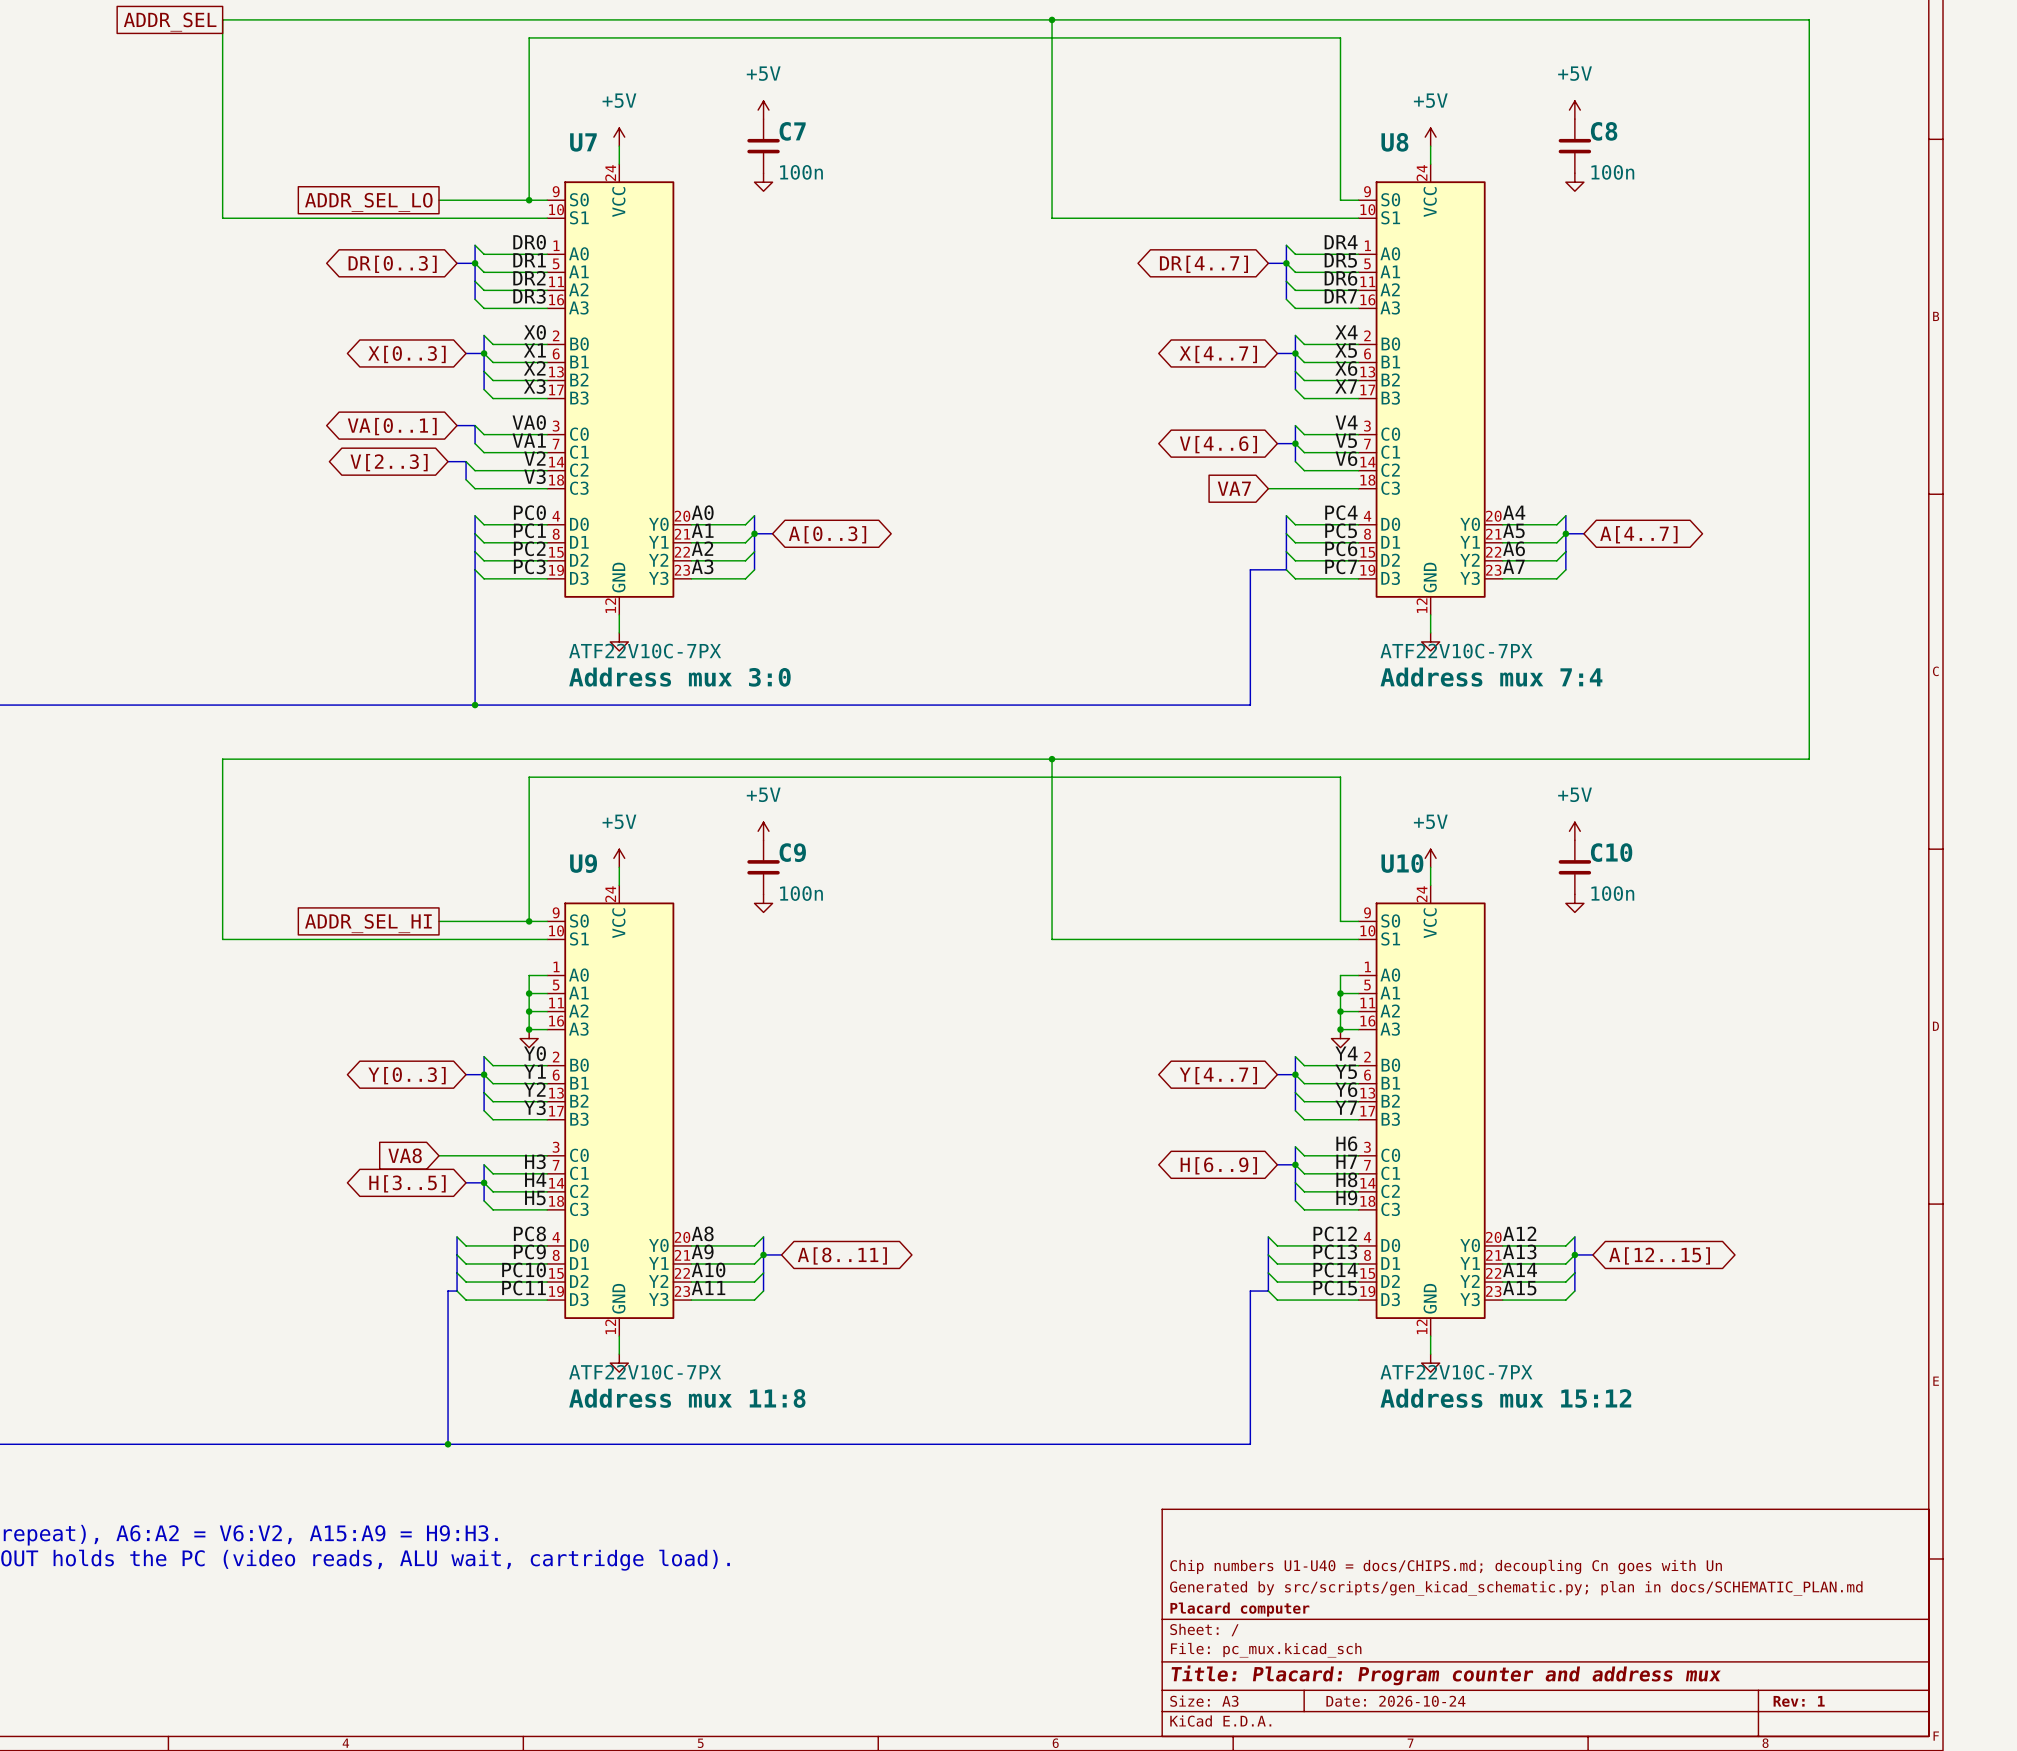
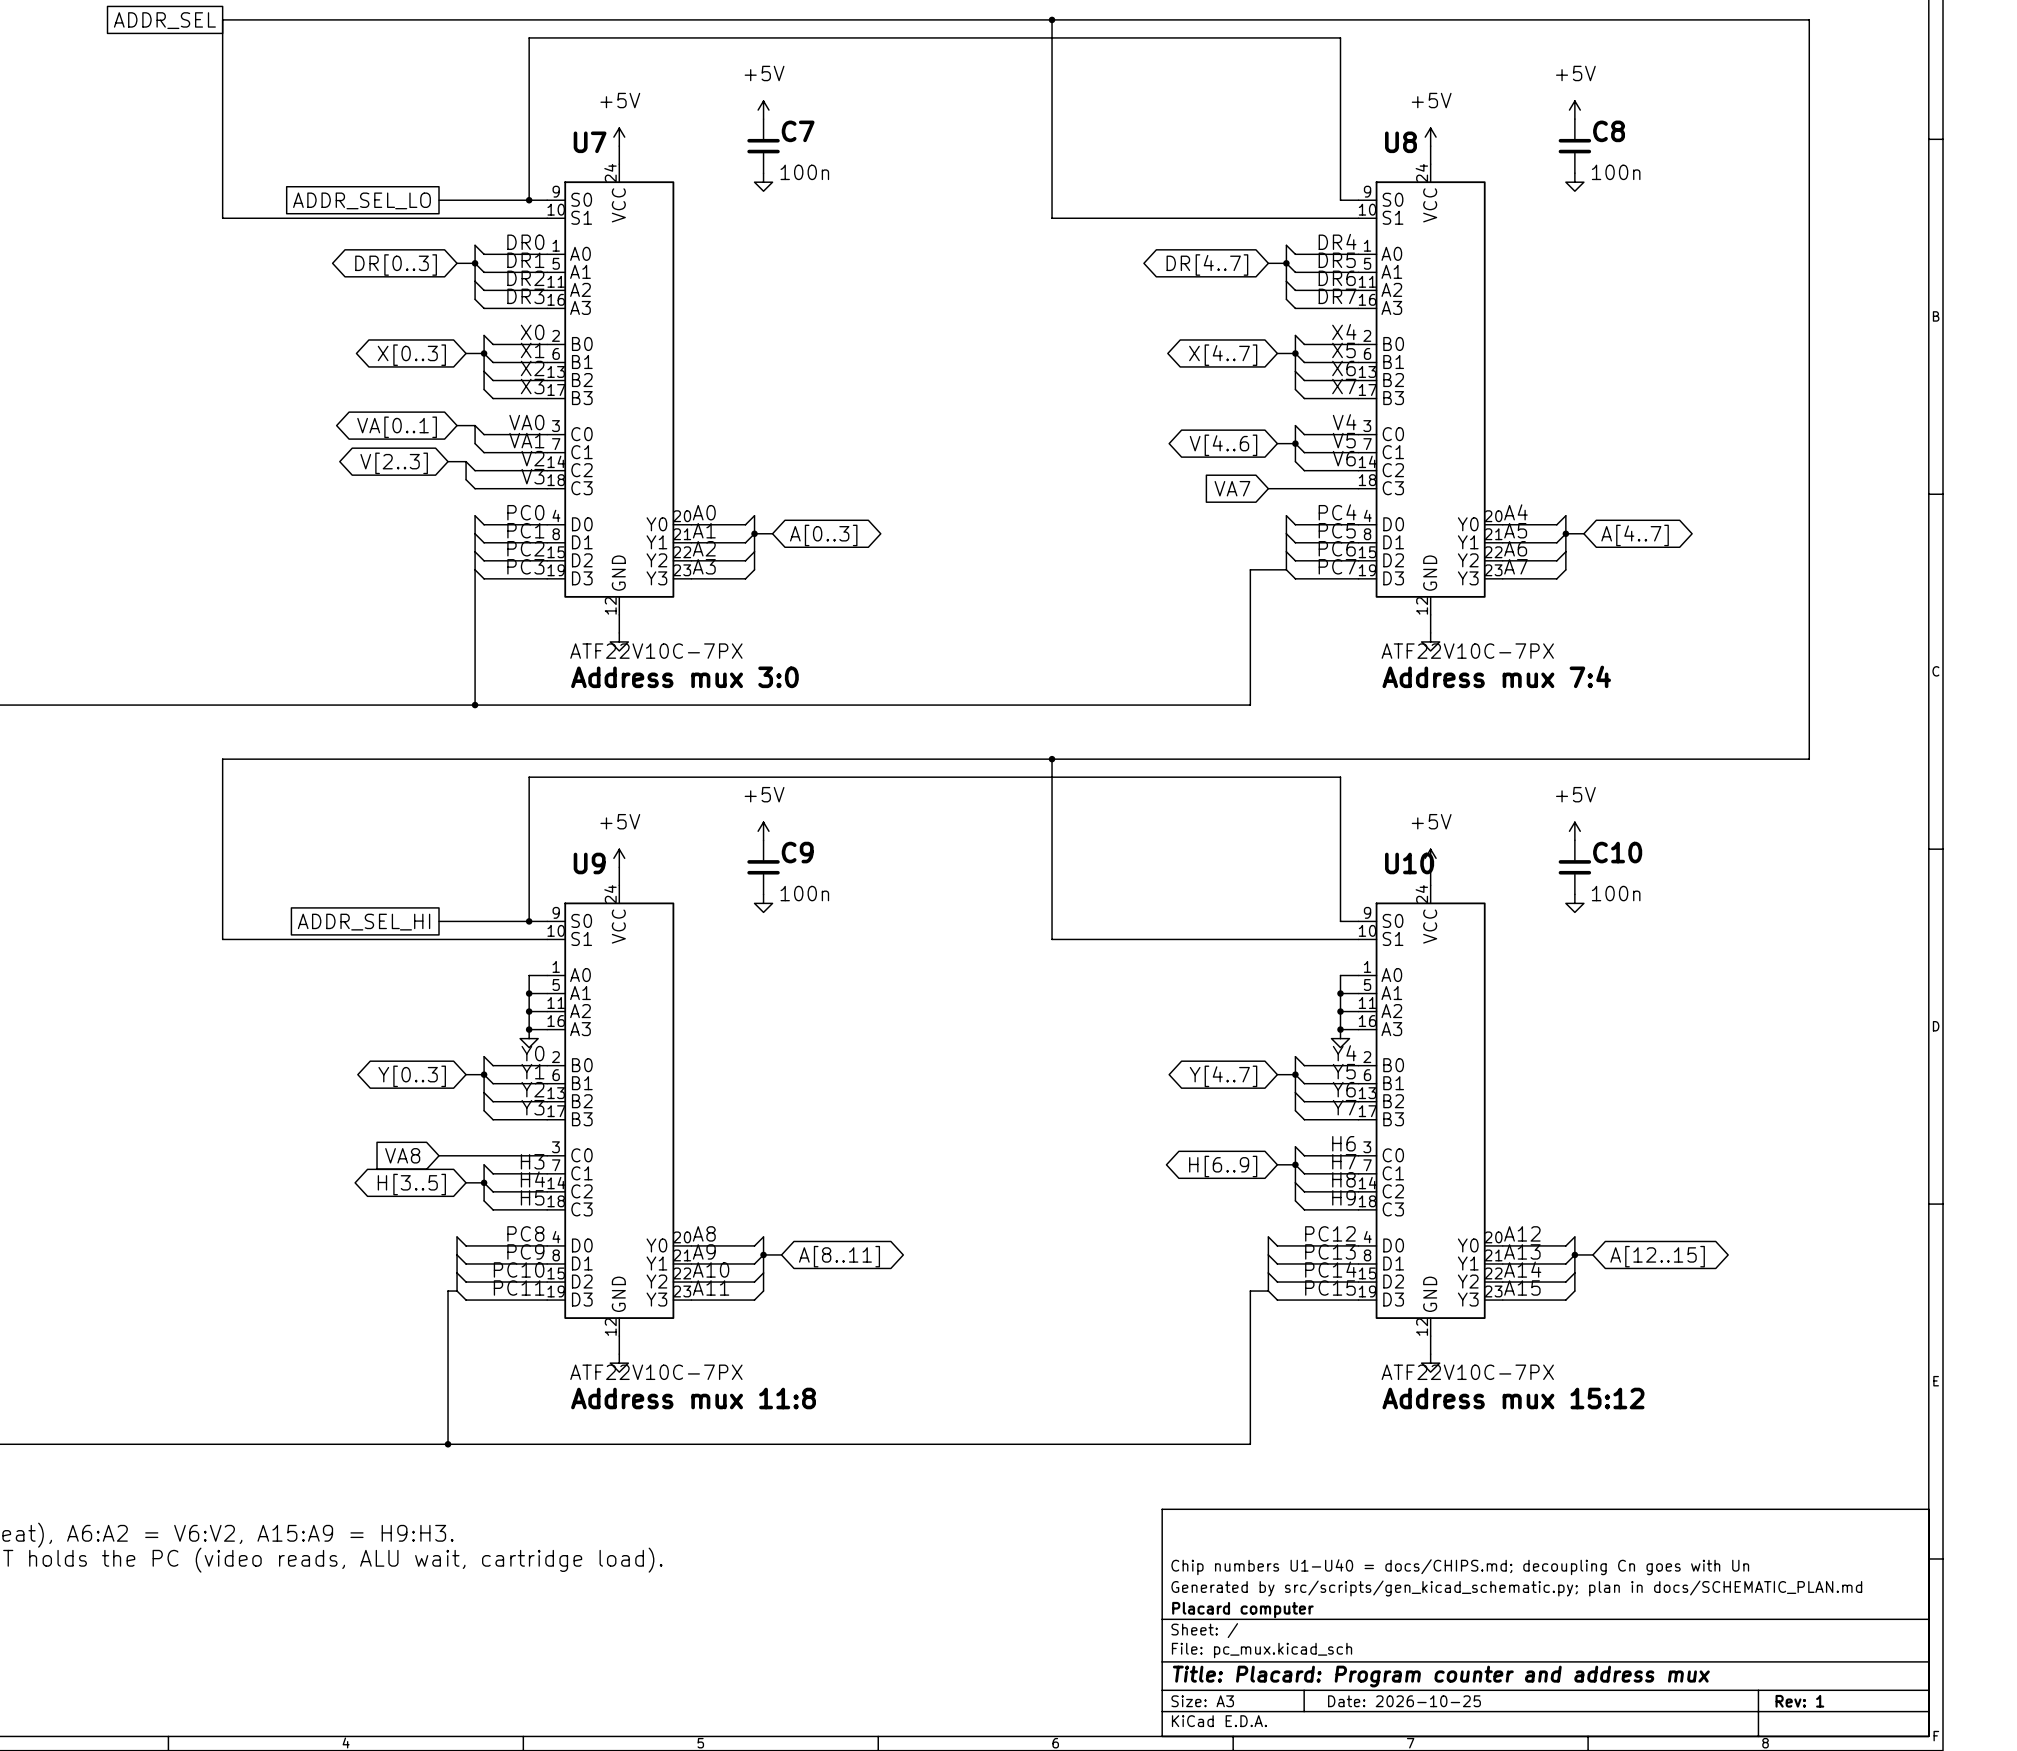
title block: Date: 2026-10-24 (1395, 1701) -> Date: 2026-10-25 (1404, 1701)

